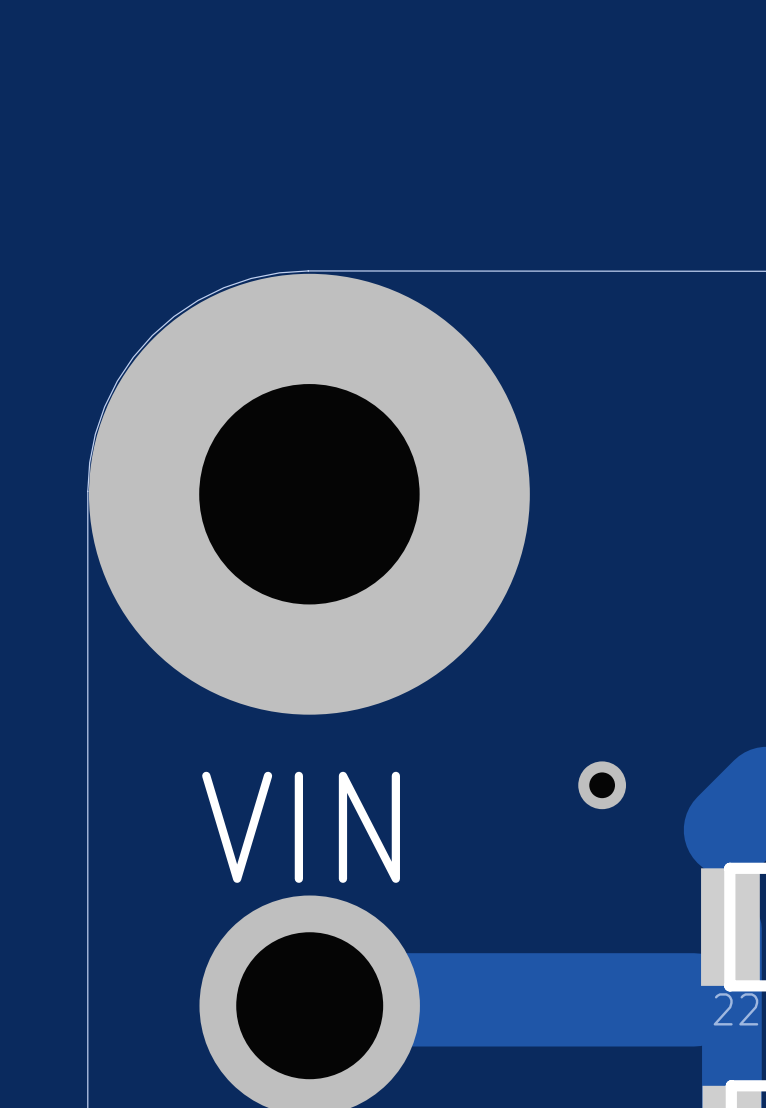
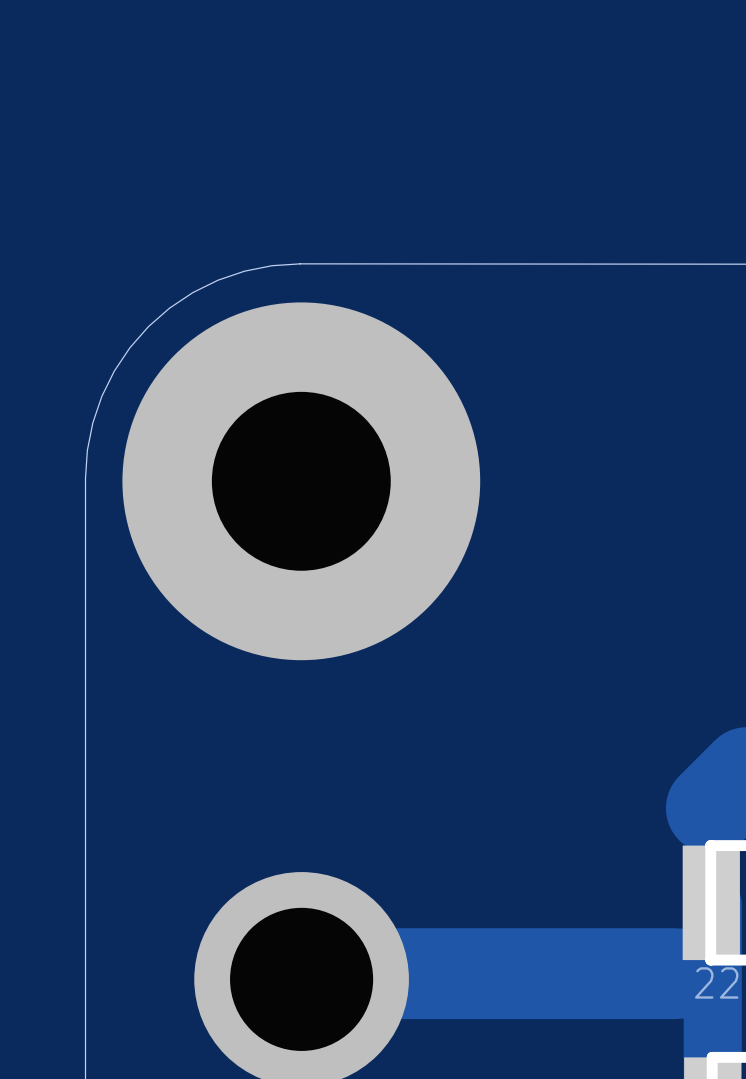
via size: [88, 273, 530, 715] -> [122, 302, 481, 661]
via: (602, 785) -> none
text: VIN (301, 827) -> none

